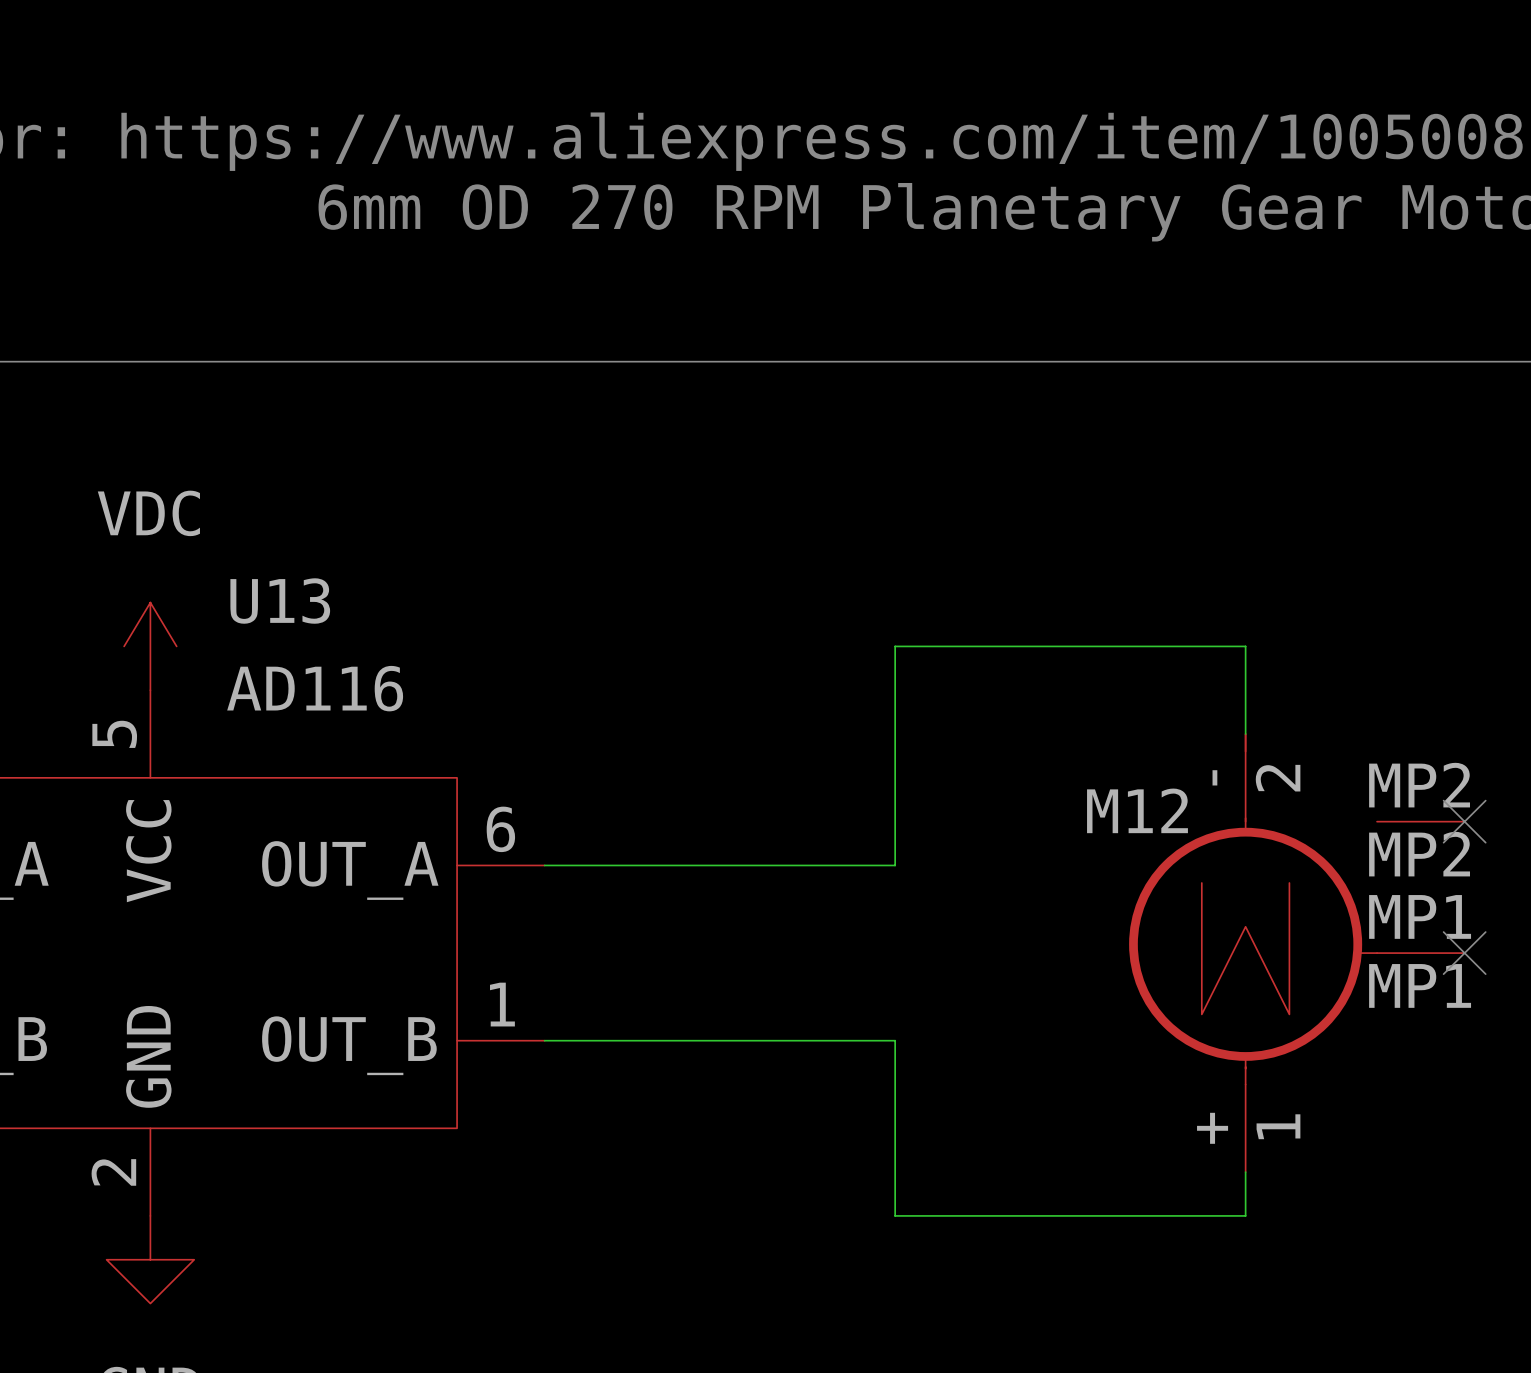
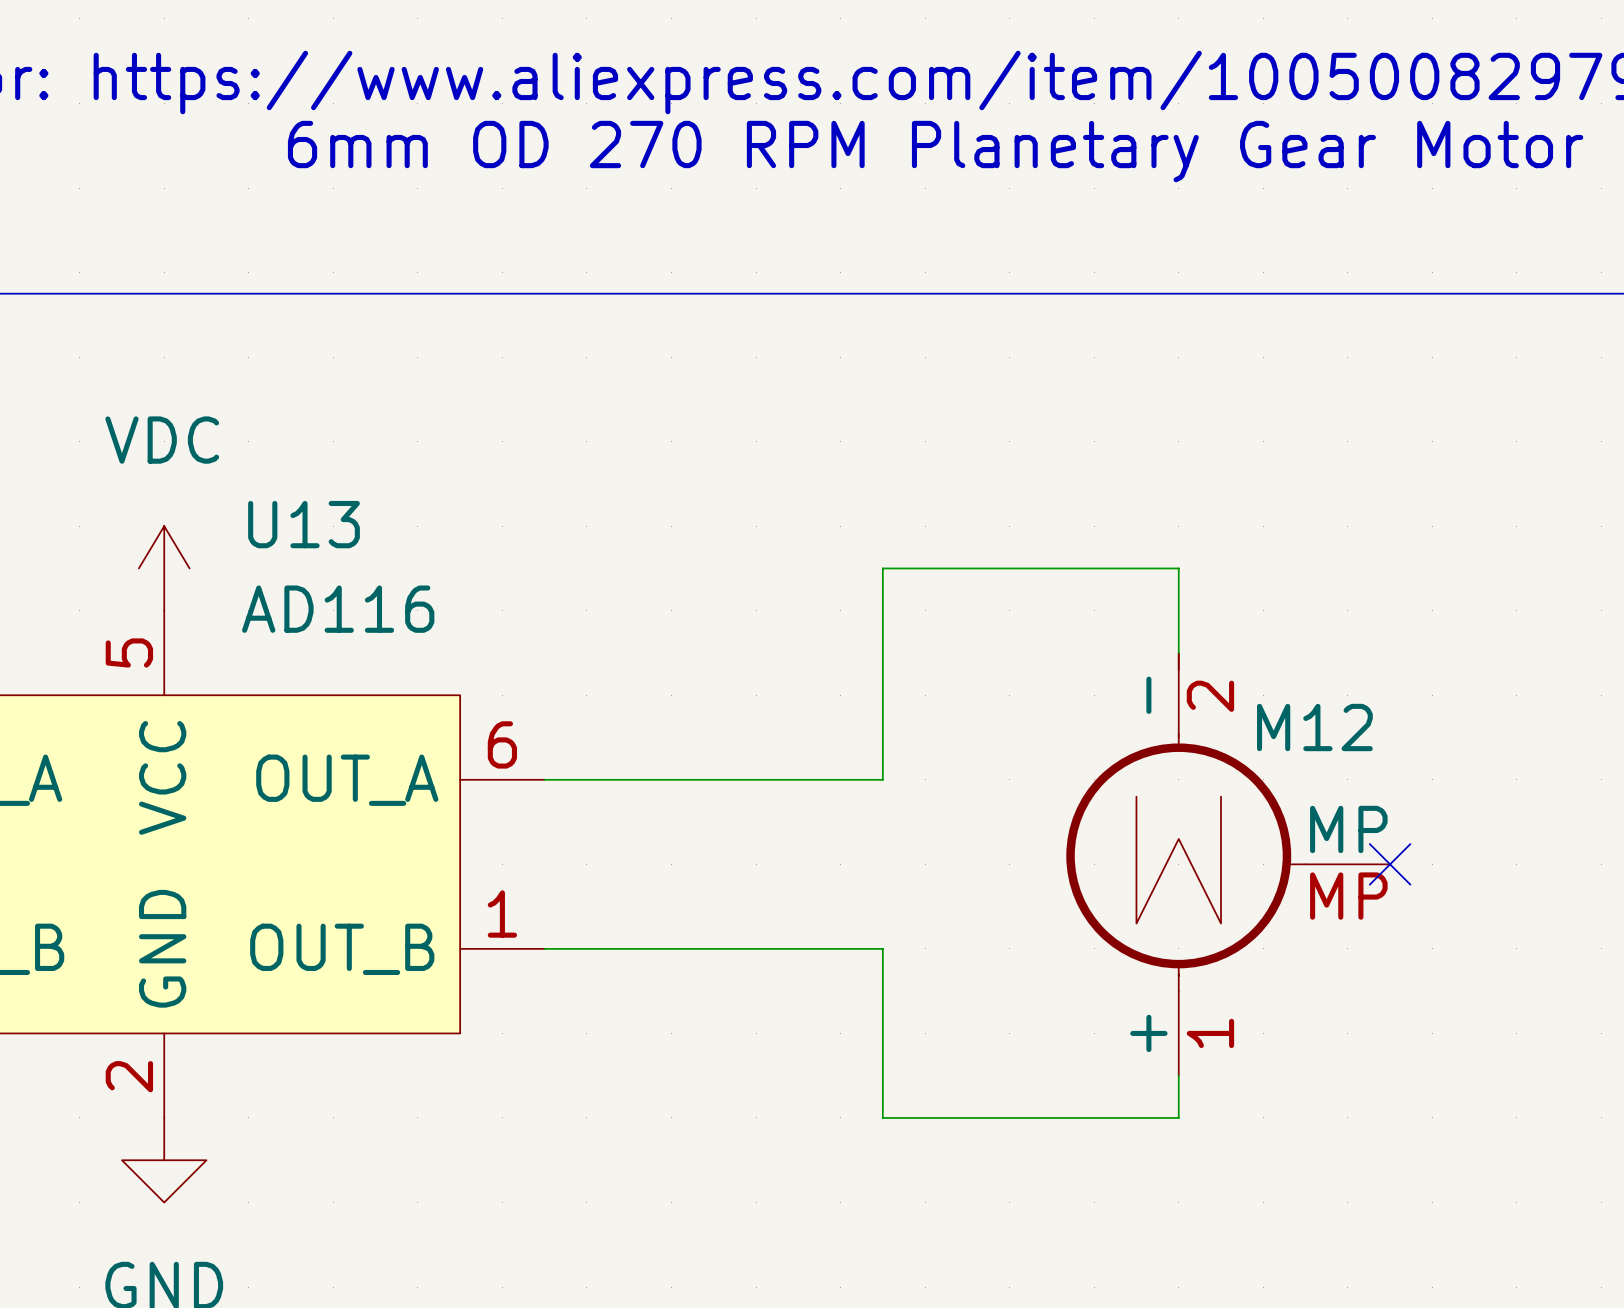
wire: (1201, 646) (1245, 646) (1245, 734) -> (1178, 568) (1178, 652)
M12 symbol: [1129, 734, 1465, 1173] -> [1066, 652, 1391, 1076]
M12 name position: M12 (1137, 810) -> M12 (1314, 727)
no-connect mark: (1464, 821) -> none
no-connect mark position: (1464, 953) -> (1390, 864)
wire: (1245, 1172) (1245, 1215) (1201, 1215) -> (1178, 1075) (1178, 1117)

